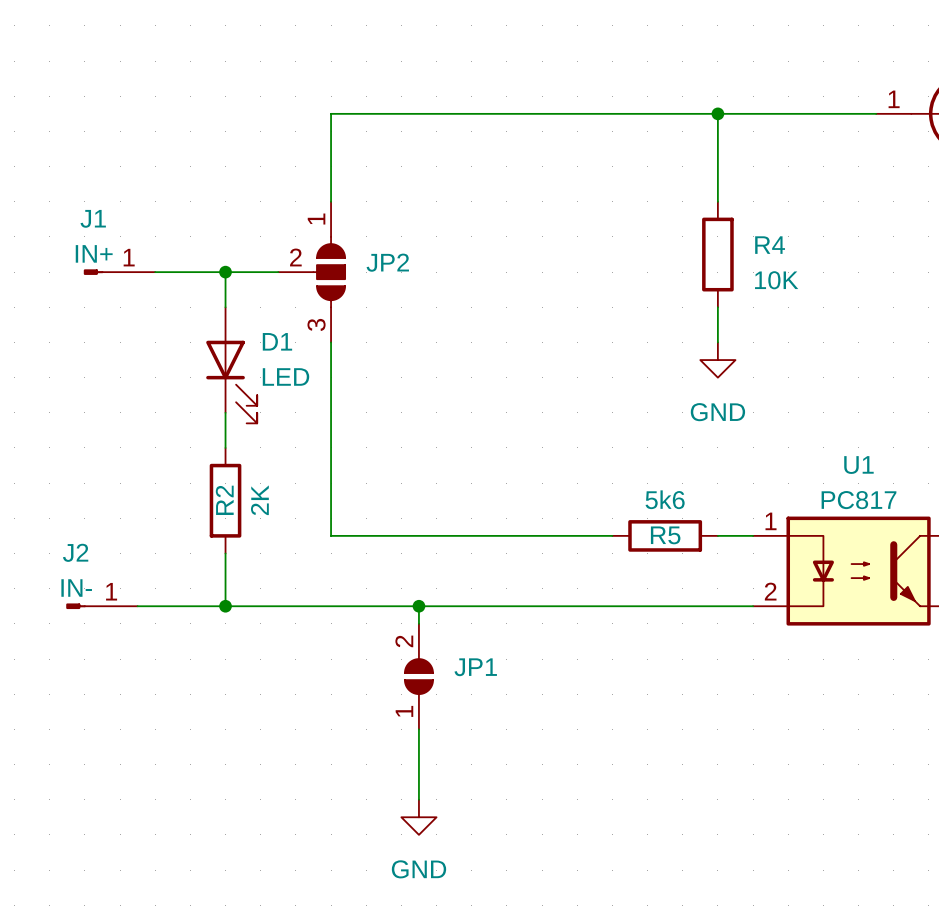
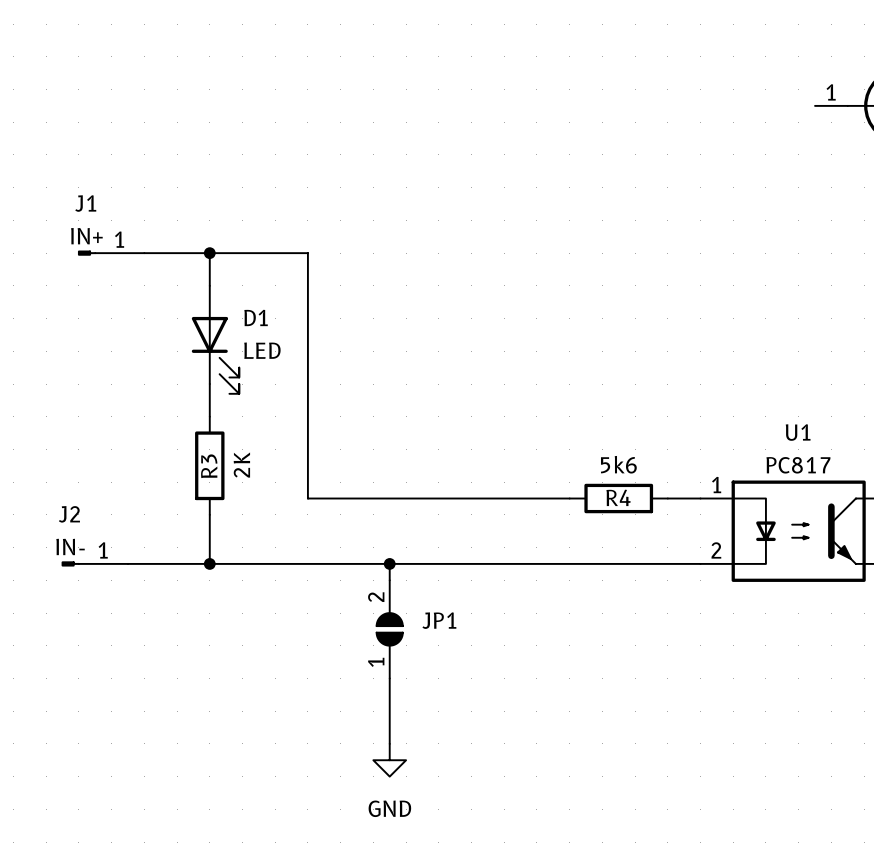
wire: (717, 113) (717, 201) -> none
junction: (717, 113) -> none
wire: (876, 113) (331, 113) (331, 201) -> none
R4: 10K (717, 254) -> none
JP2: (311, 272) -> none
wire: (717, 307) (717, 342) -> none
power symbol: GND (717, 360) -> none
R2 name: R2 (224, 500) -> R3 (209, 466)
R5 name: R5 (665, 535) -> R4 (618, 497)

